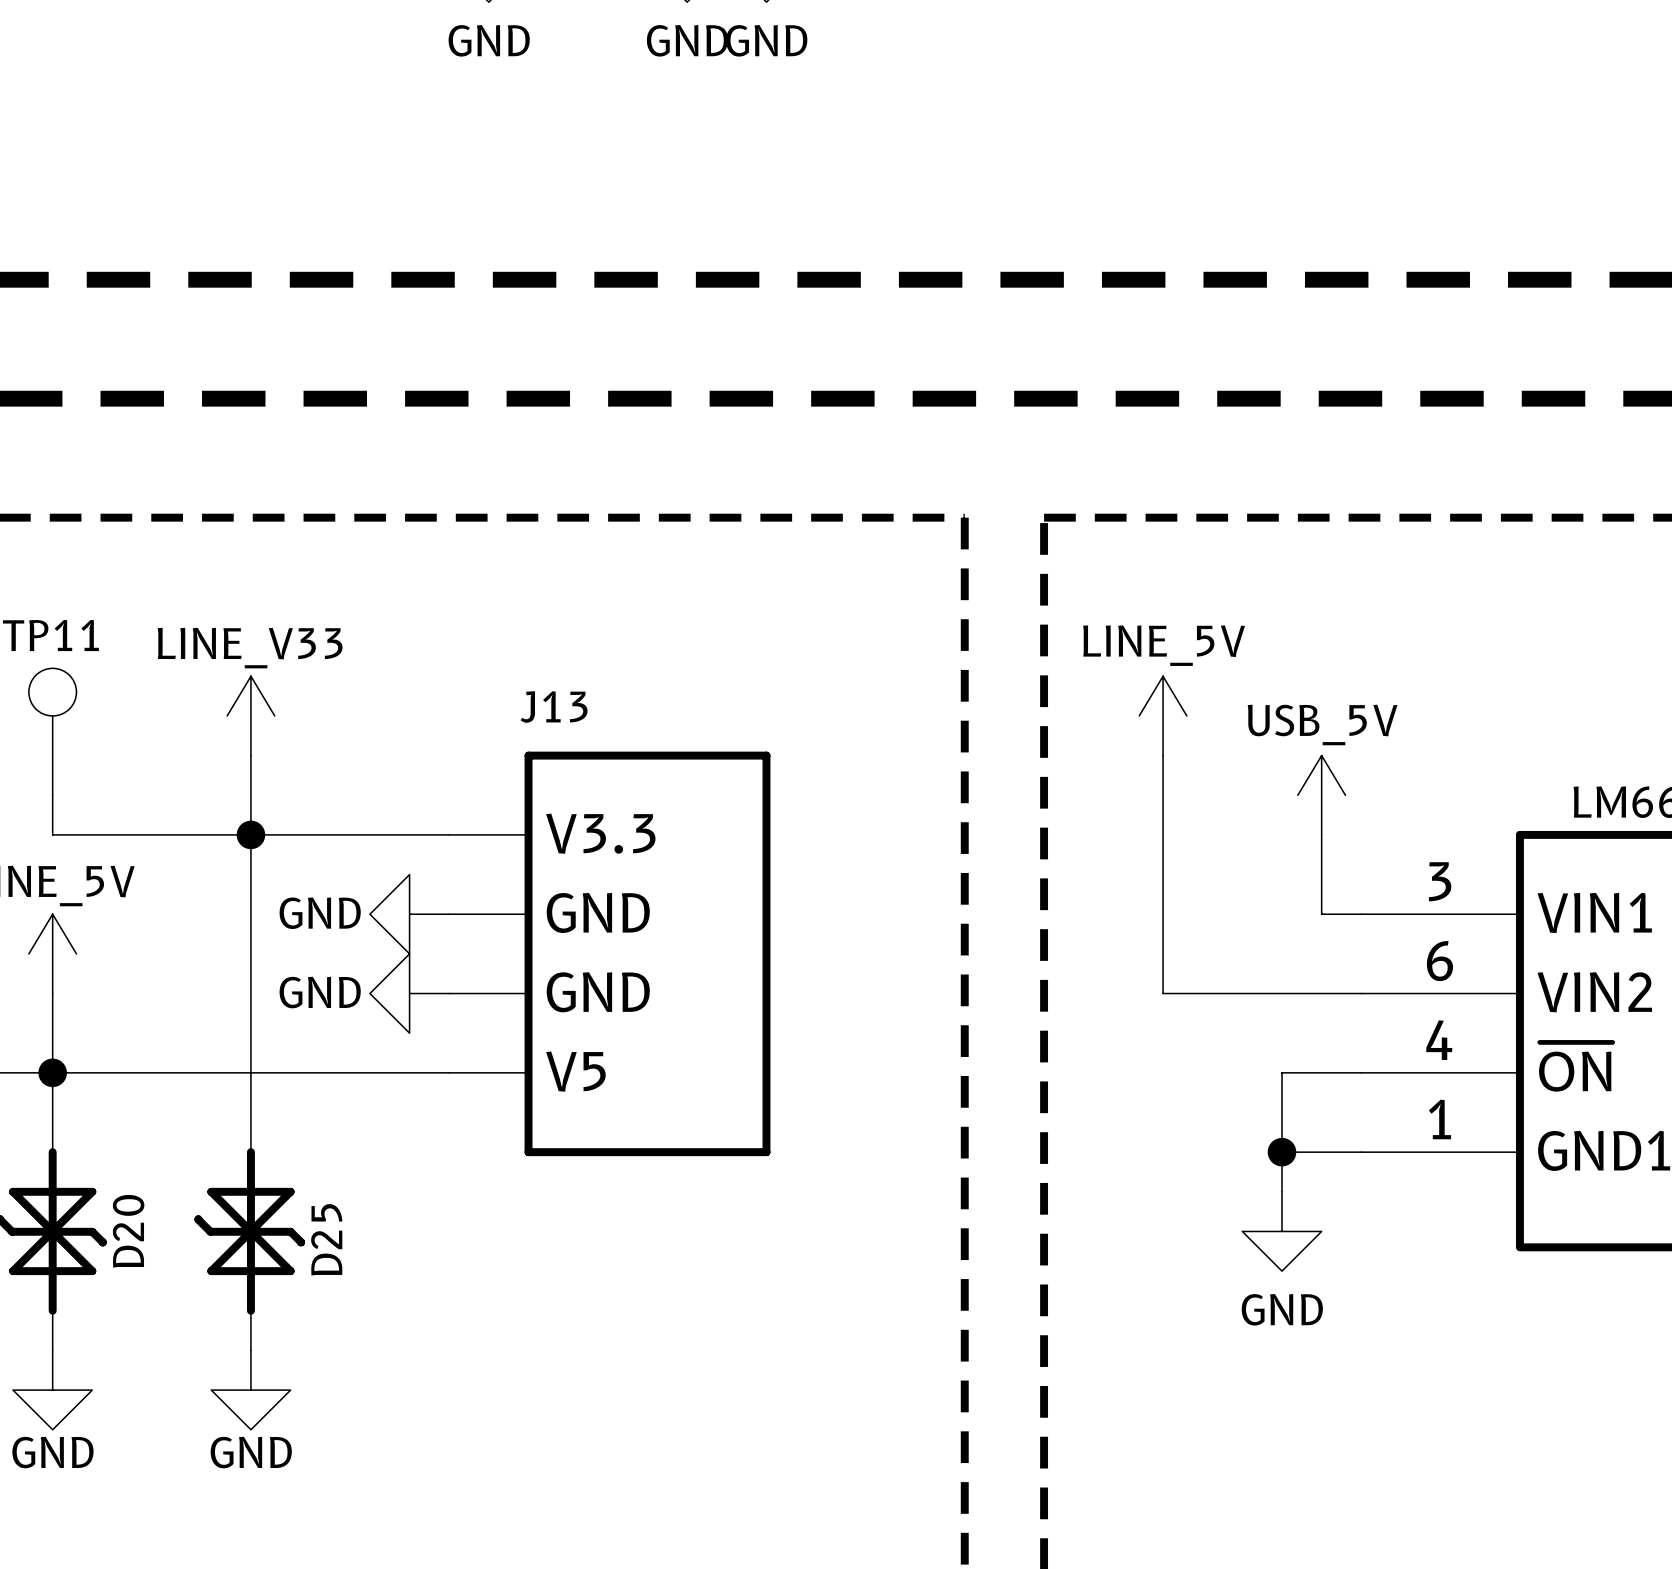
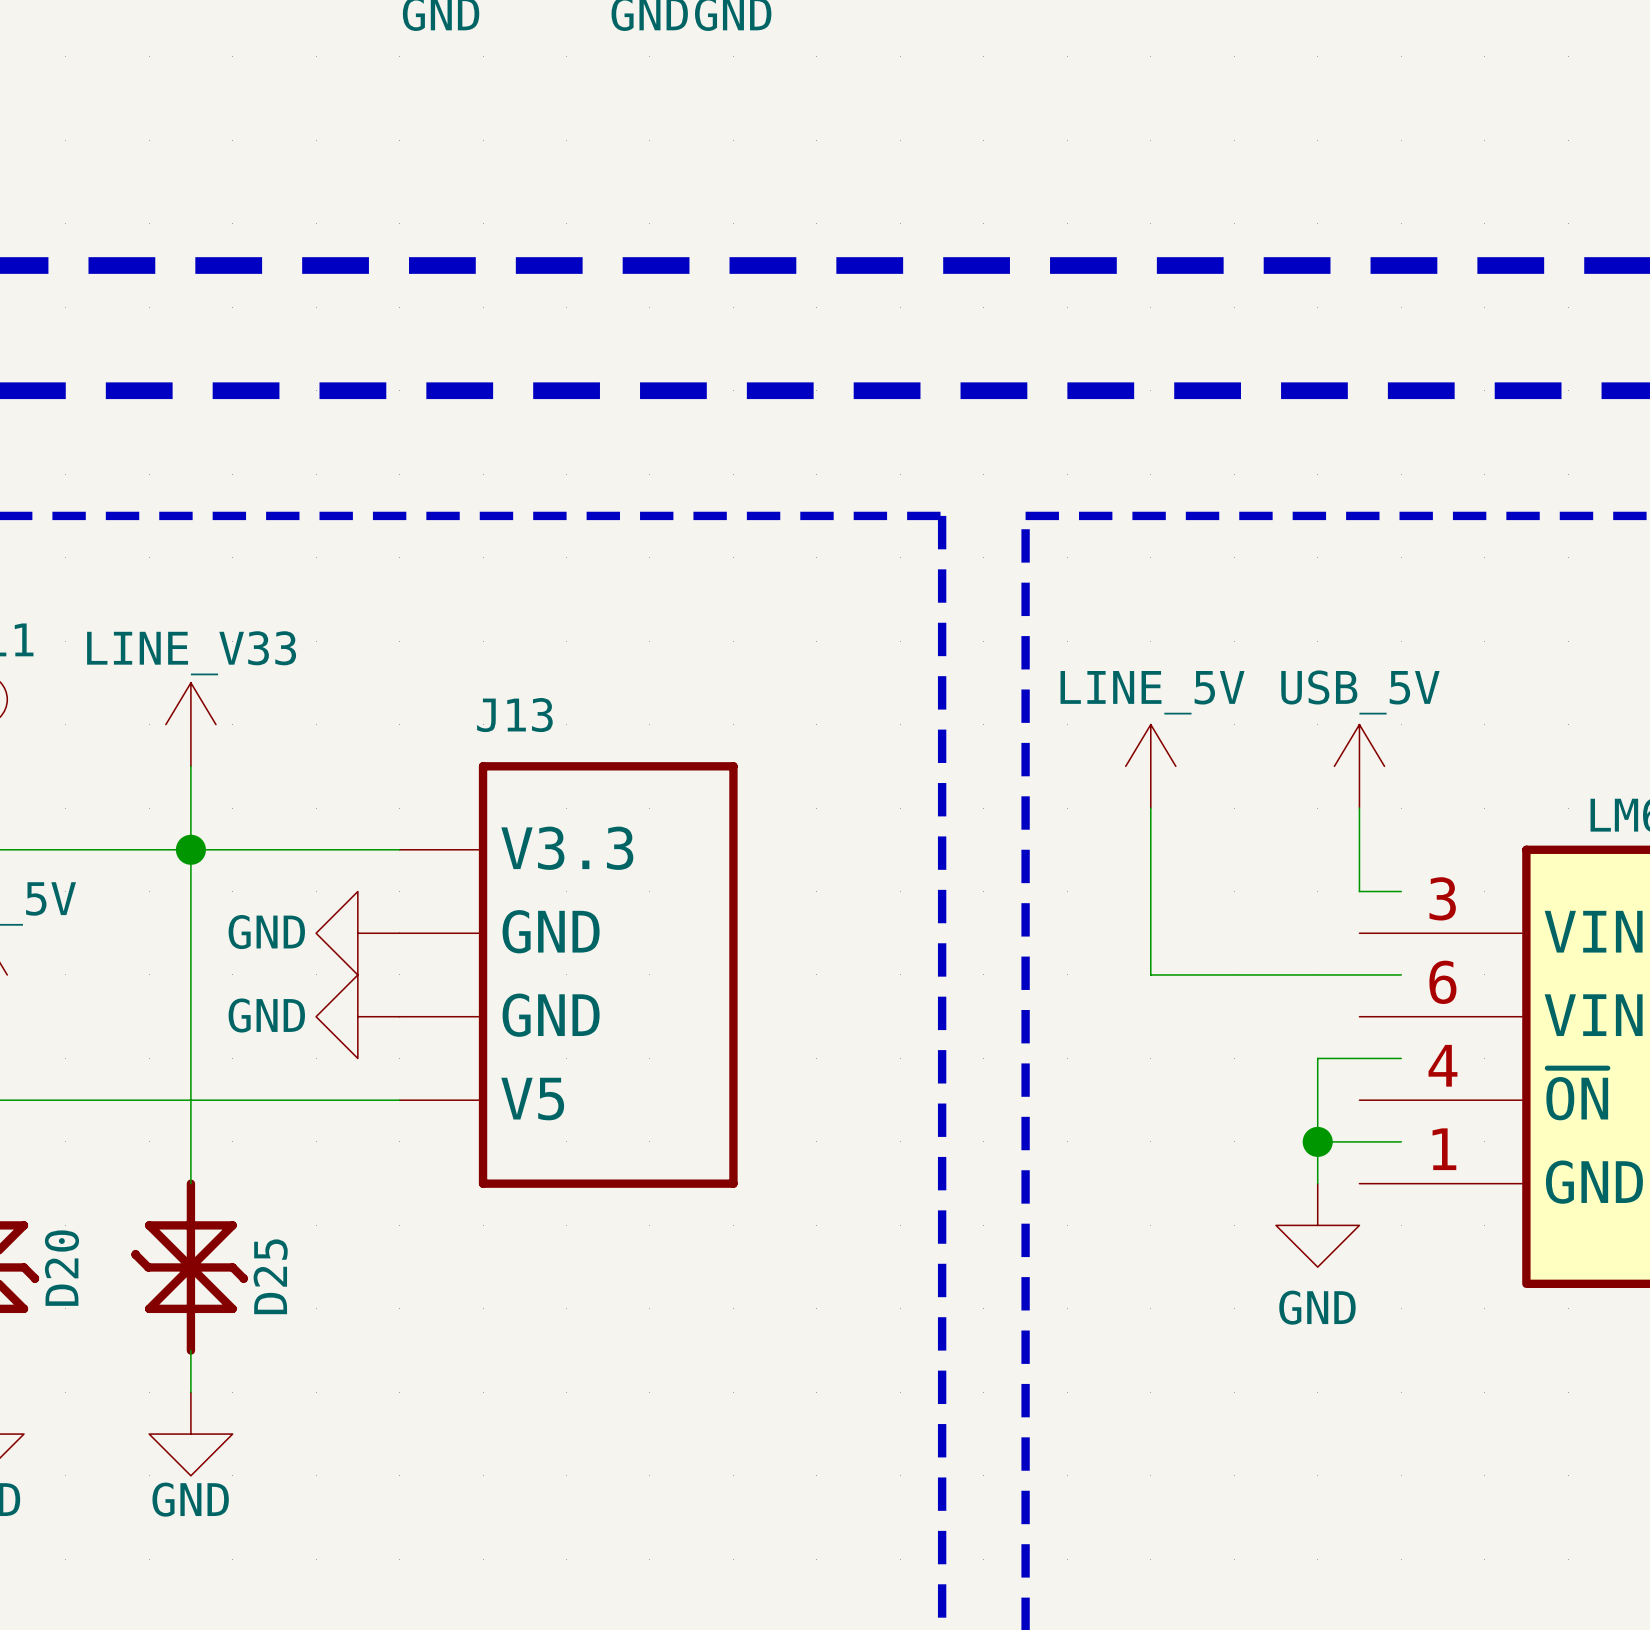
power symbol position: LINE_5V (1163, 715) -> LINE_5V (1150, 766)
power symbol position: USB_5V (1321, 795) -> USB_5V (1359, 766)
wire: (1321, 834) (1321, 914) (1361, 914) -> (1359, 808) (1359, 891) (1401, 891)
wire: (1163, 953) (1163, 993) (1361, 993) -> (1150, 974) (1401, 974)
wire: (1361, 1072) (1282, 1072) (1282, 1191) -> (1401, 1058) (1317, 1058) (1317, 1183)
wire: (1282, 1152) (1361, 1152) -> (1317, 1141) (1401, 1141)
junction position: (1282, 1152) -> (1317, 1141)
power symbol position: GND (1282, 1231) -> GND (1317, 1225)

